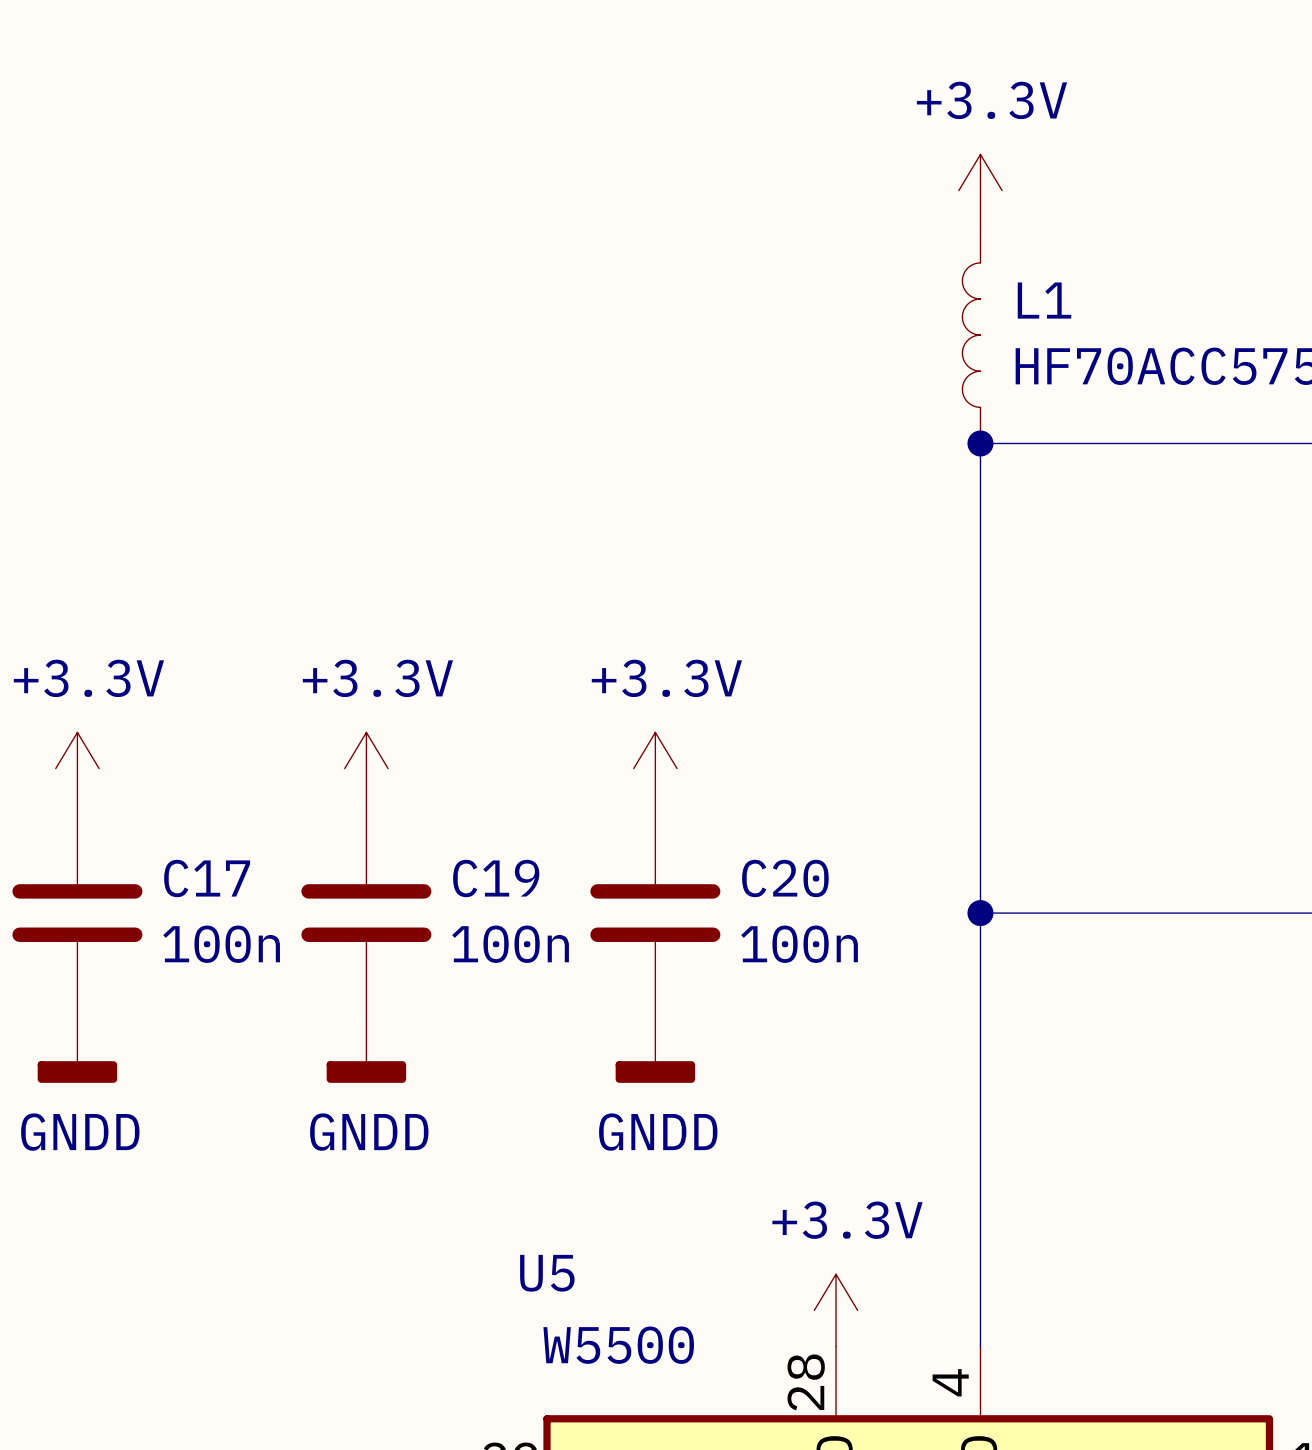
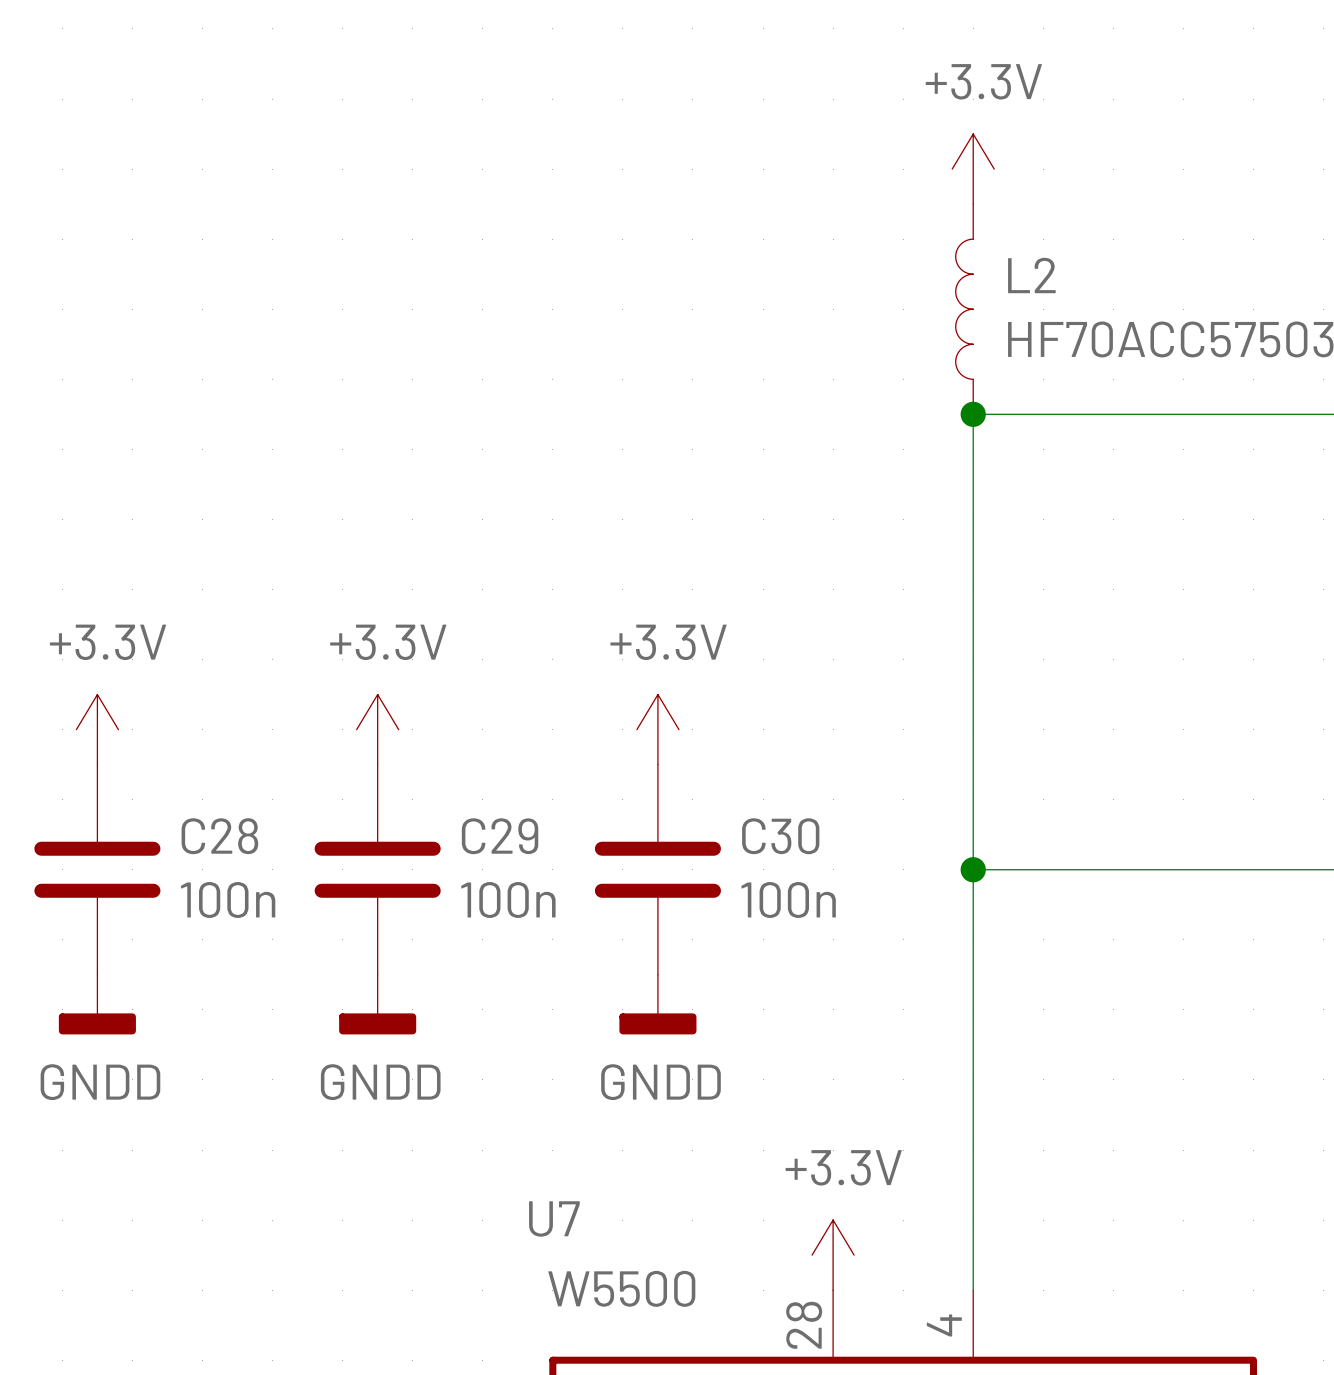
L1 name: L1 (1044, 300) -> L2 (1031, 275)
C17 name: C17 (207, 878) -> C28 (219, 836)
C19 name: C19 (496, 878) -> C29 (500, 836)
C20 name: C20 (785, 878) -> C30 (780, 836)
U5 name: U5 (547, 1273) -> U7 (554, 1218)

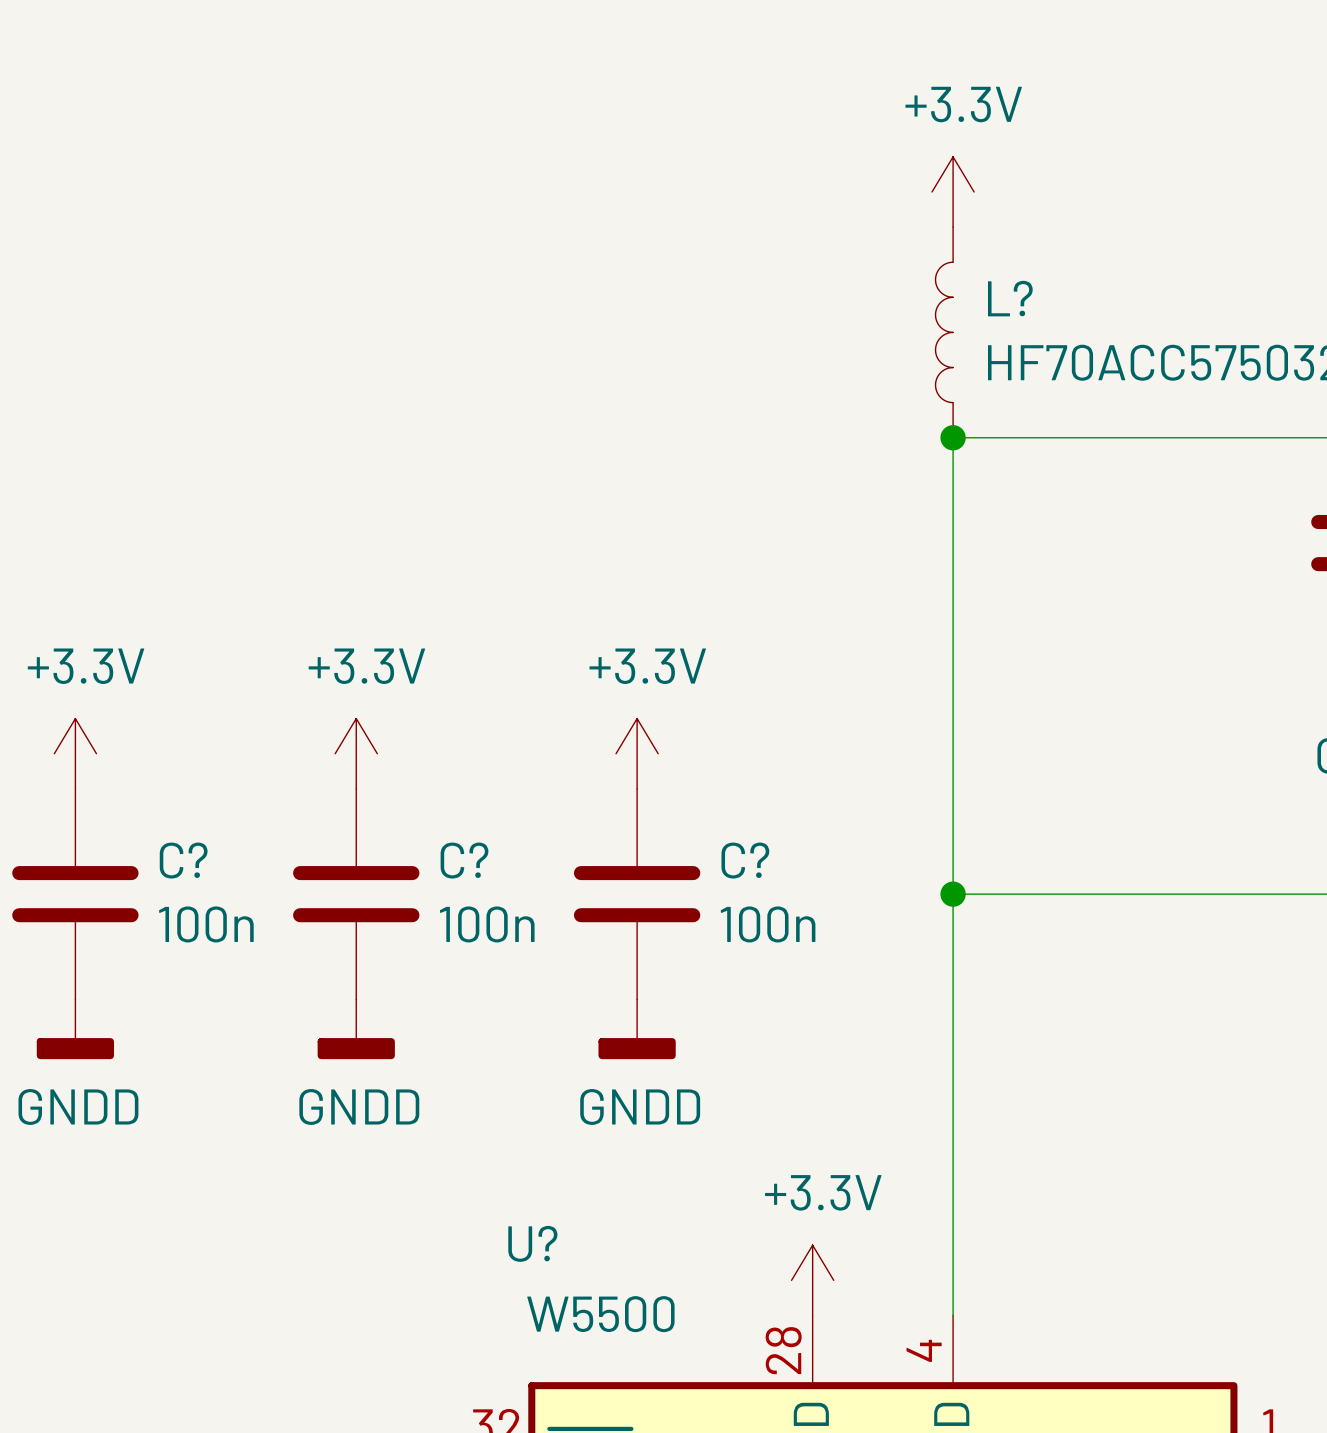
L2 name: L2 (1031, 275) -> L? (1010, 298)
C28 name: C28 (219, 836) -> C? (183, 860)
C29 name: C29 (500, 836) -> C? (464, 860)
C30 name: C30 (780, 836) -> C? (745, 860)
U7 name: U7 (554, 1218) -> U? (532, 1243)

